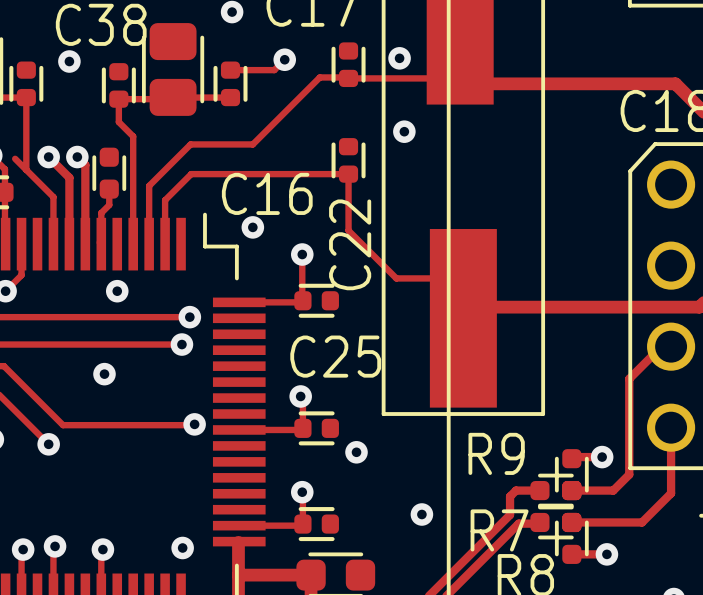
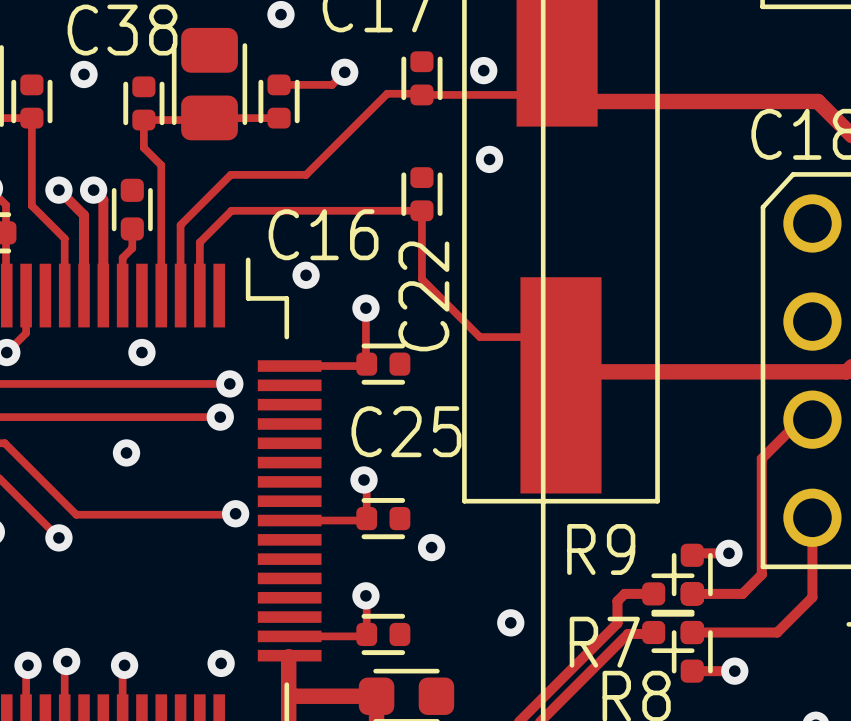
track: (15, 158) (26, 169) -> none

